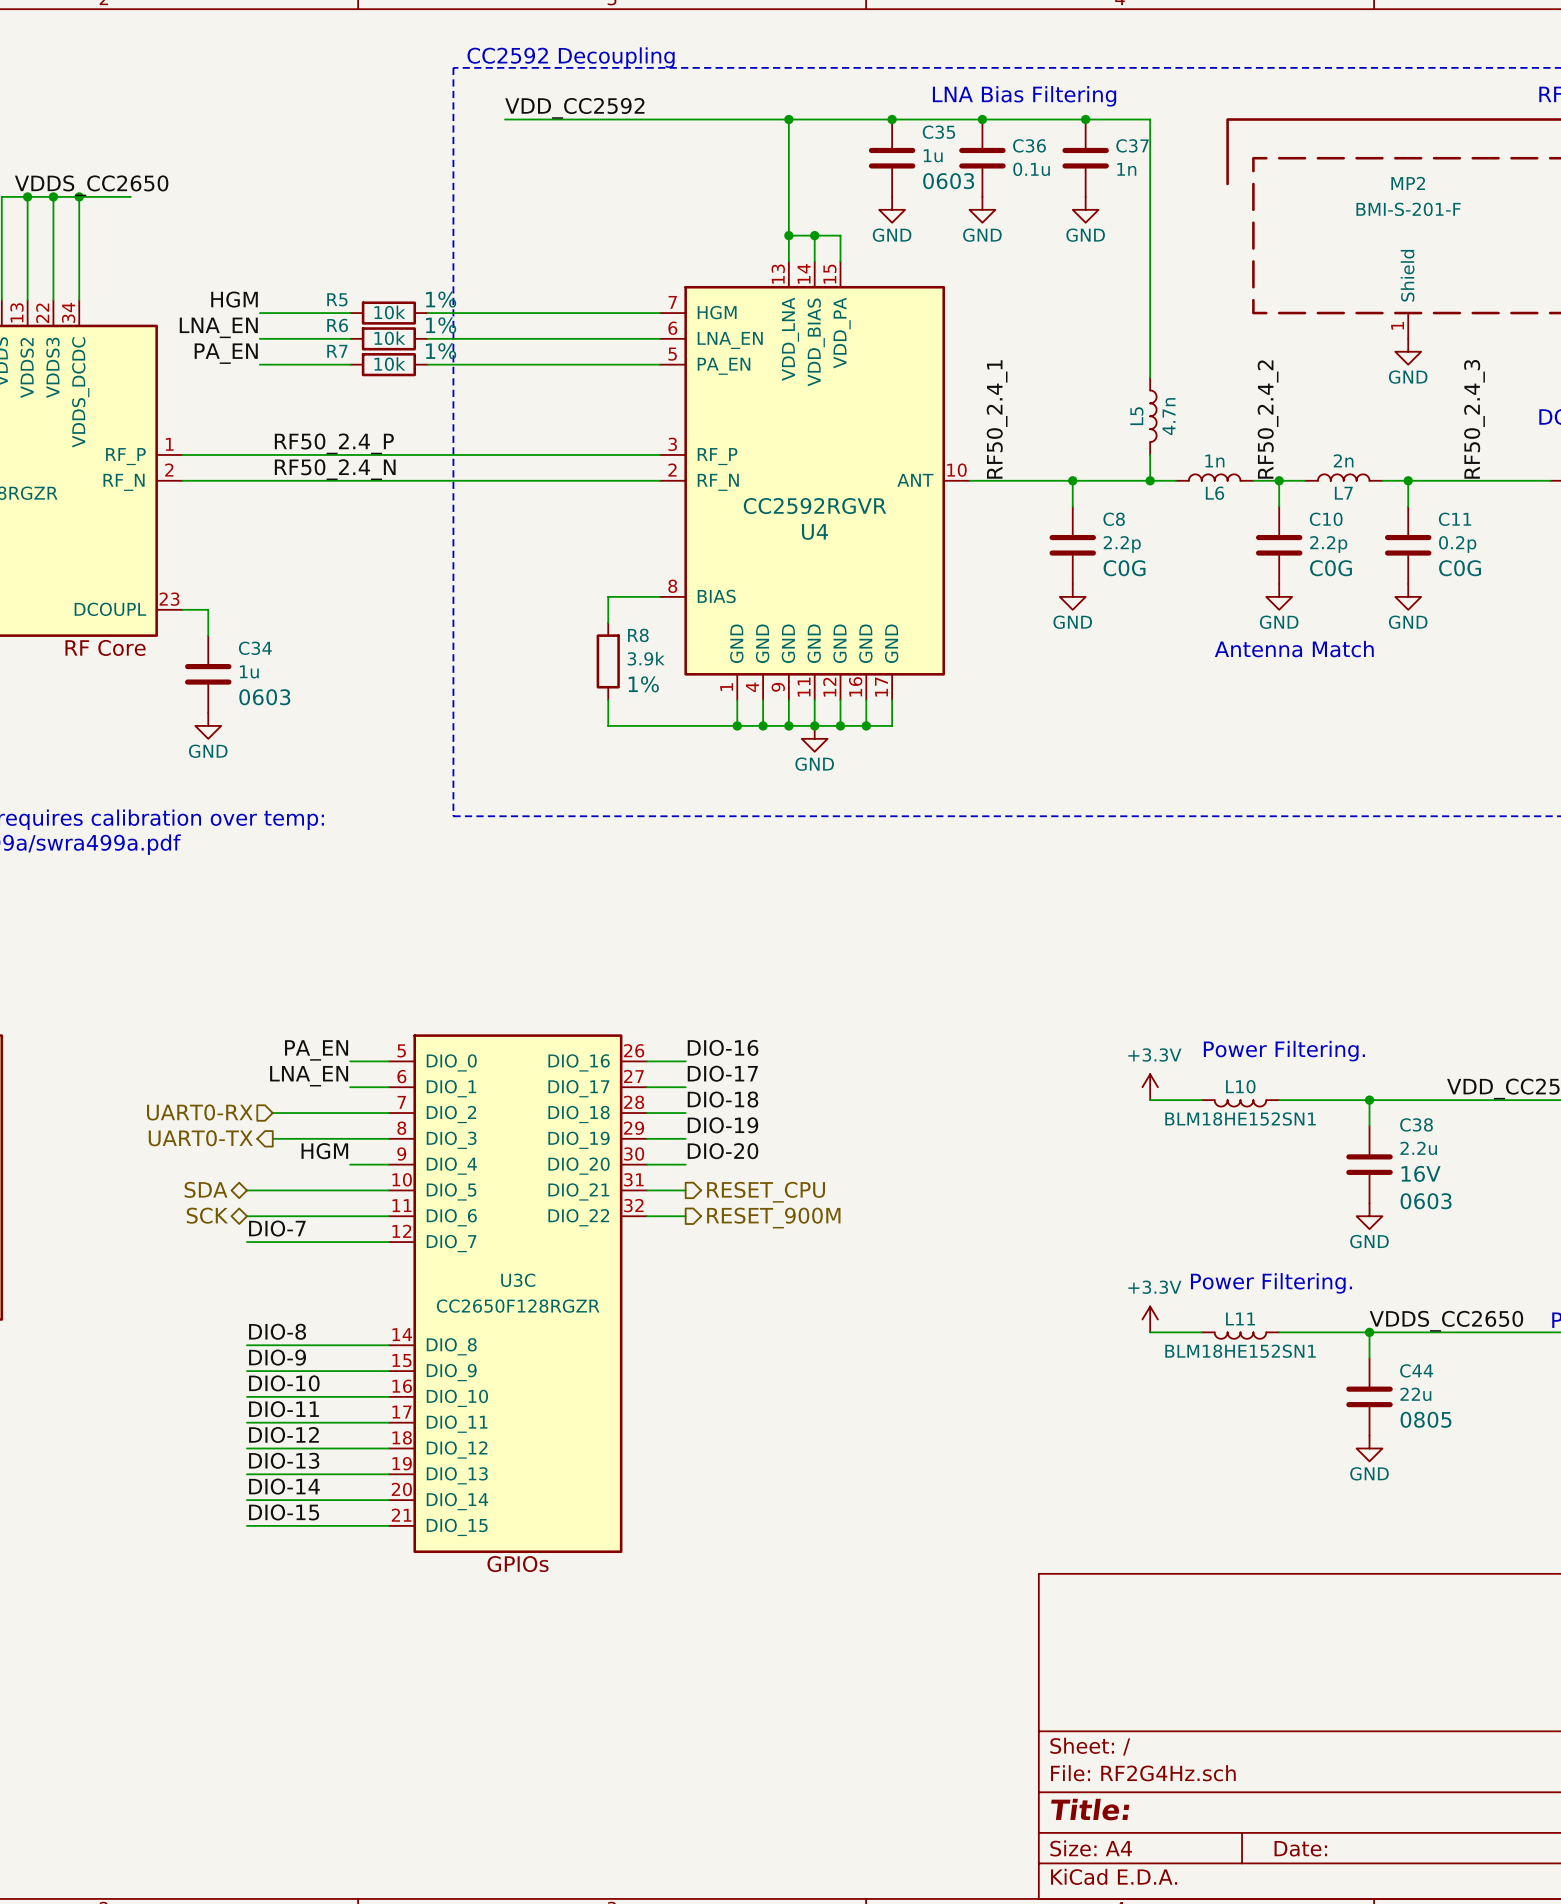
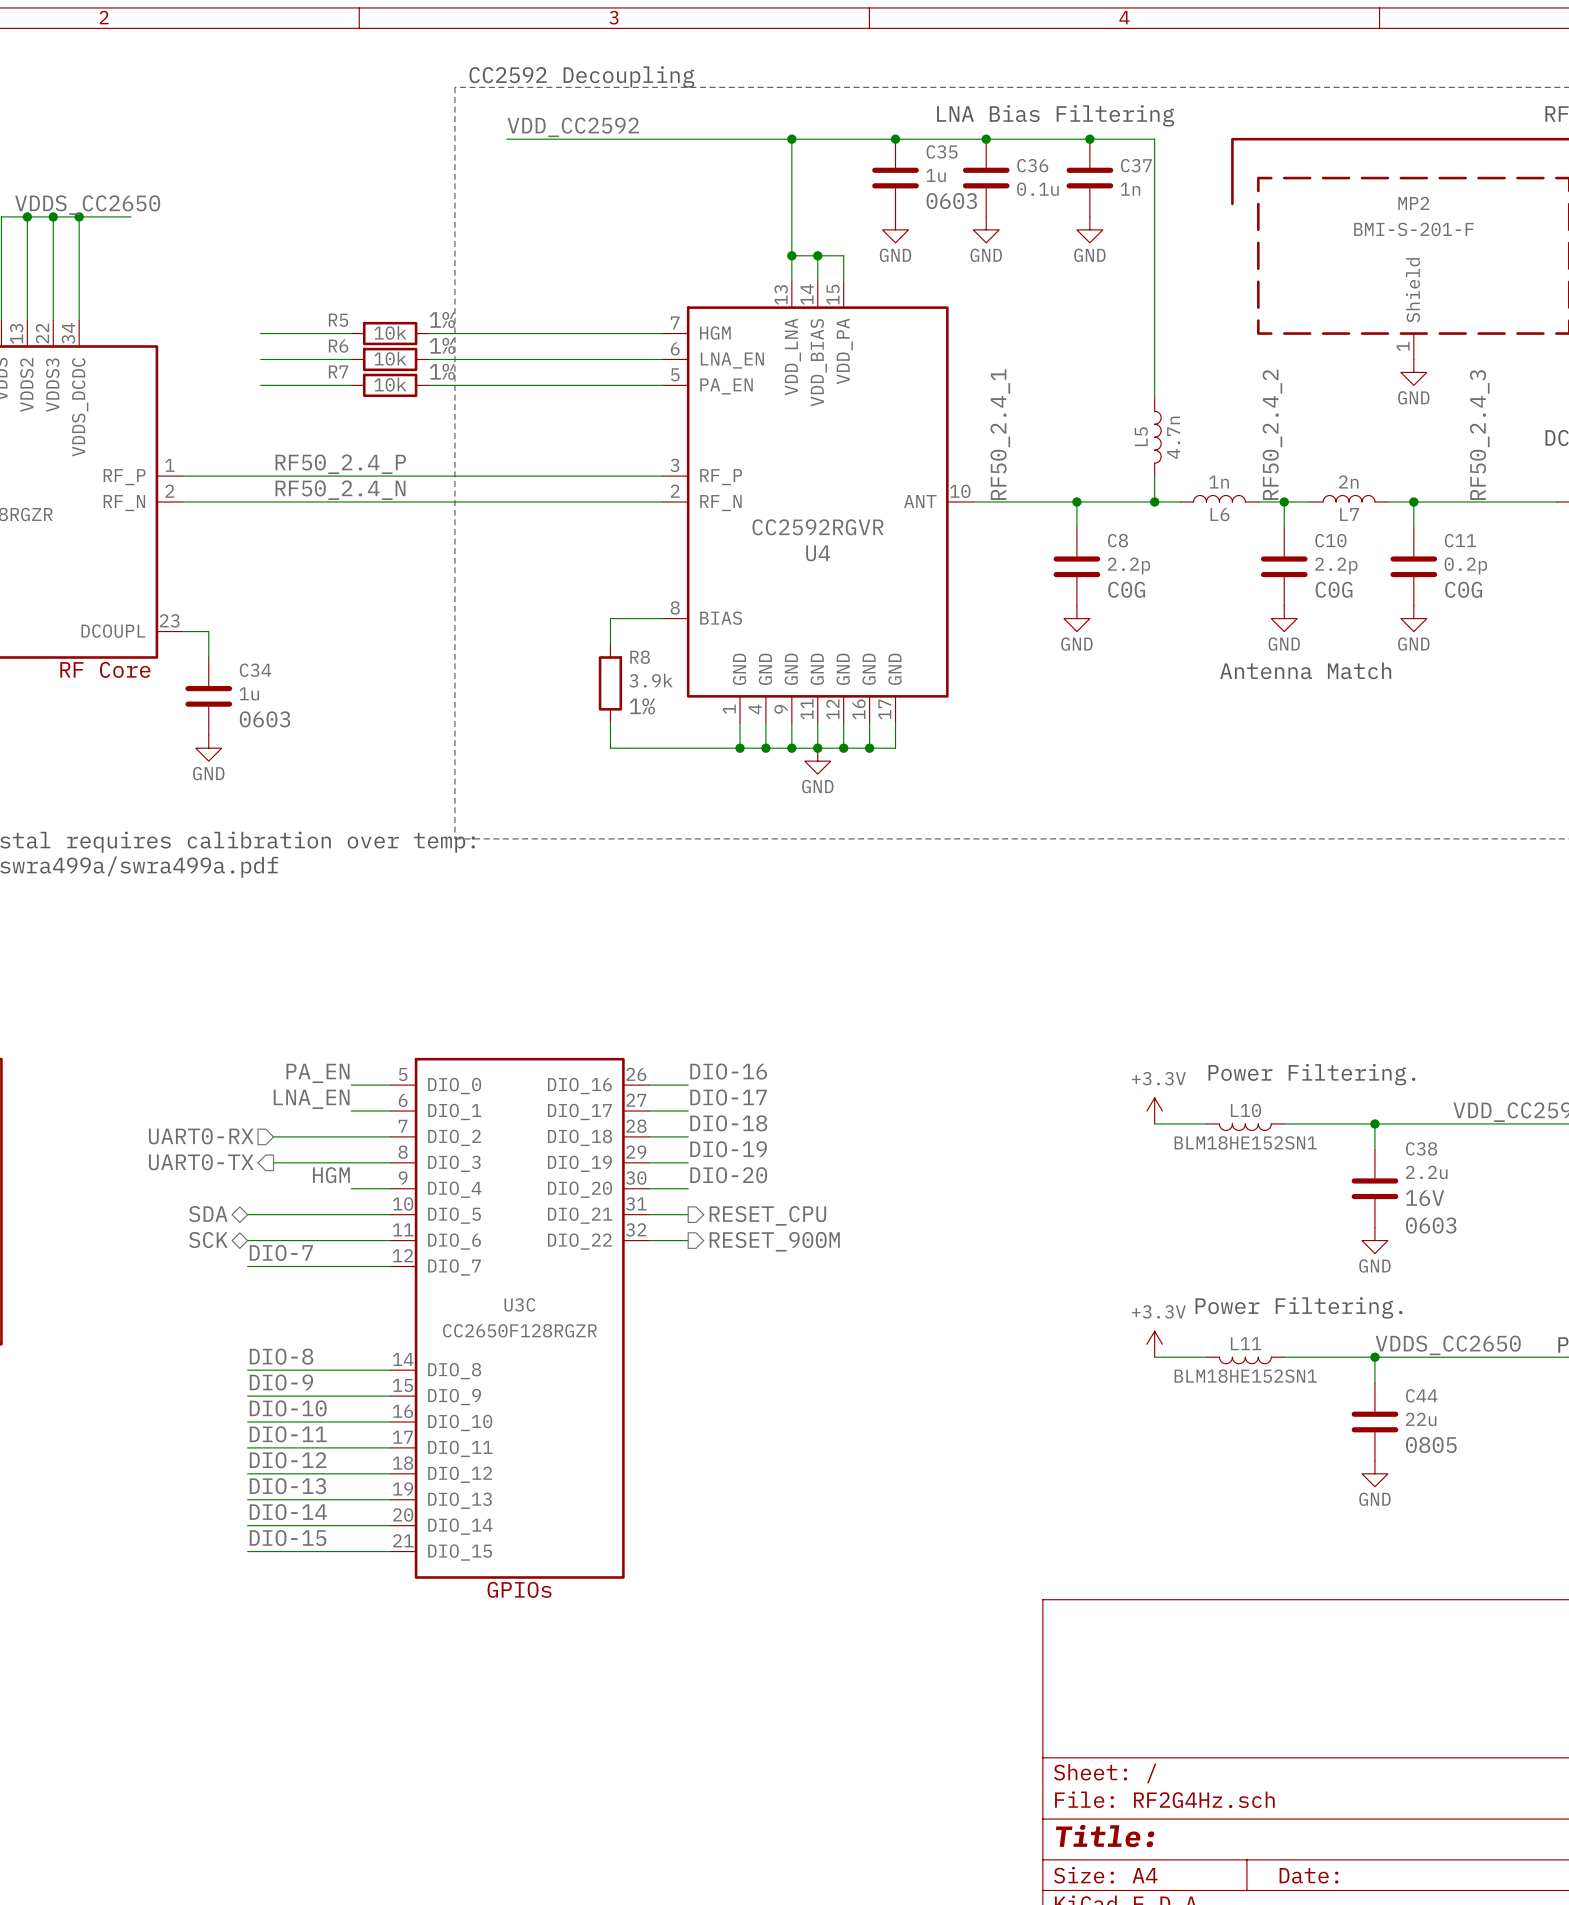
label: HGM (234, 299) -> none
label: LNA_EN (218, 327) -> none
label: PA_EN (226, 353) -> none

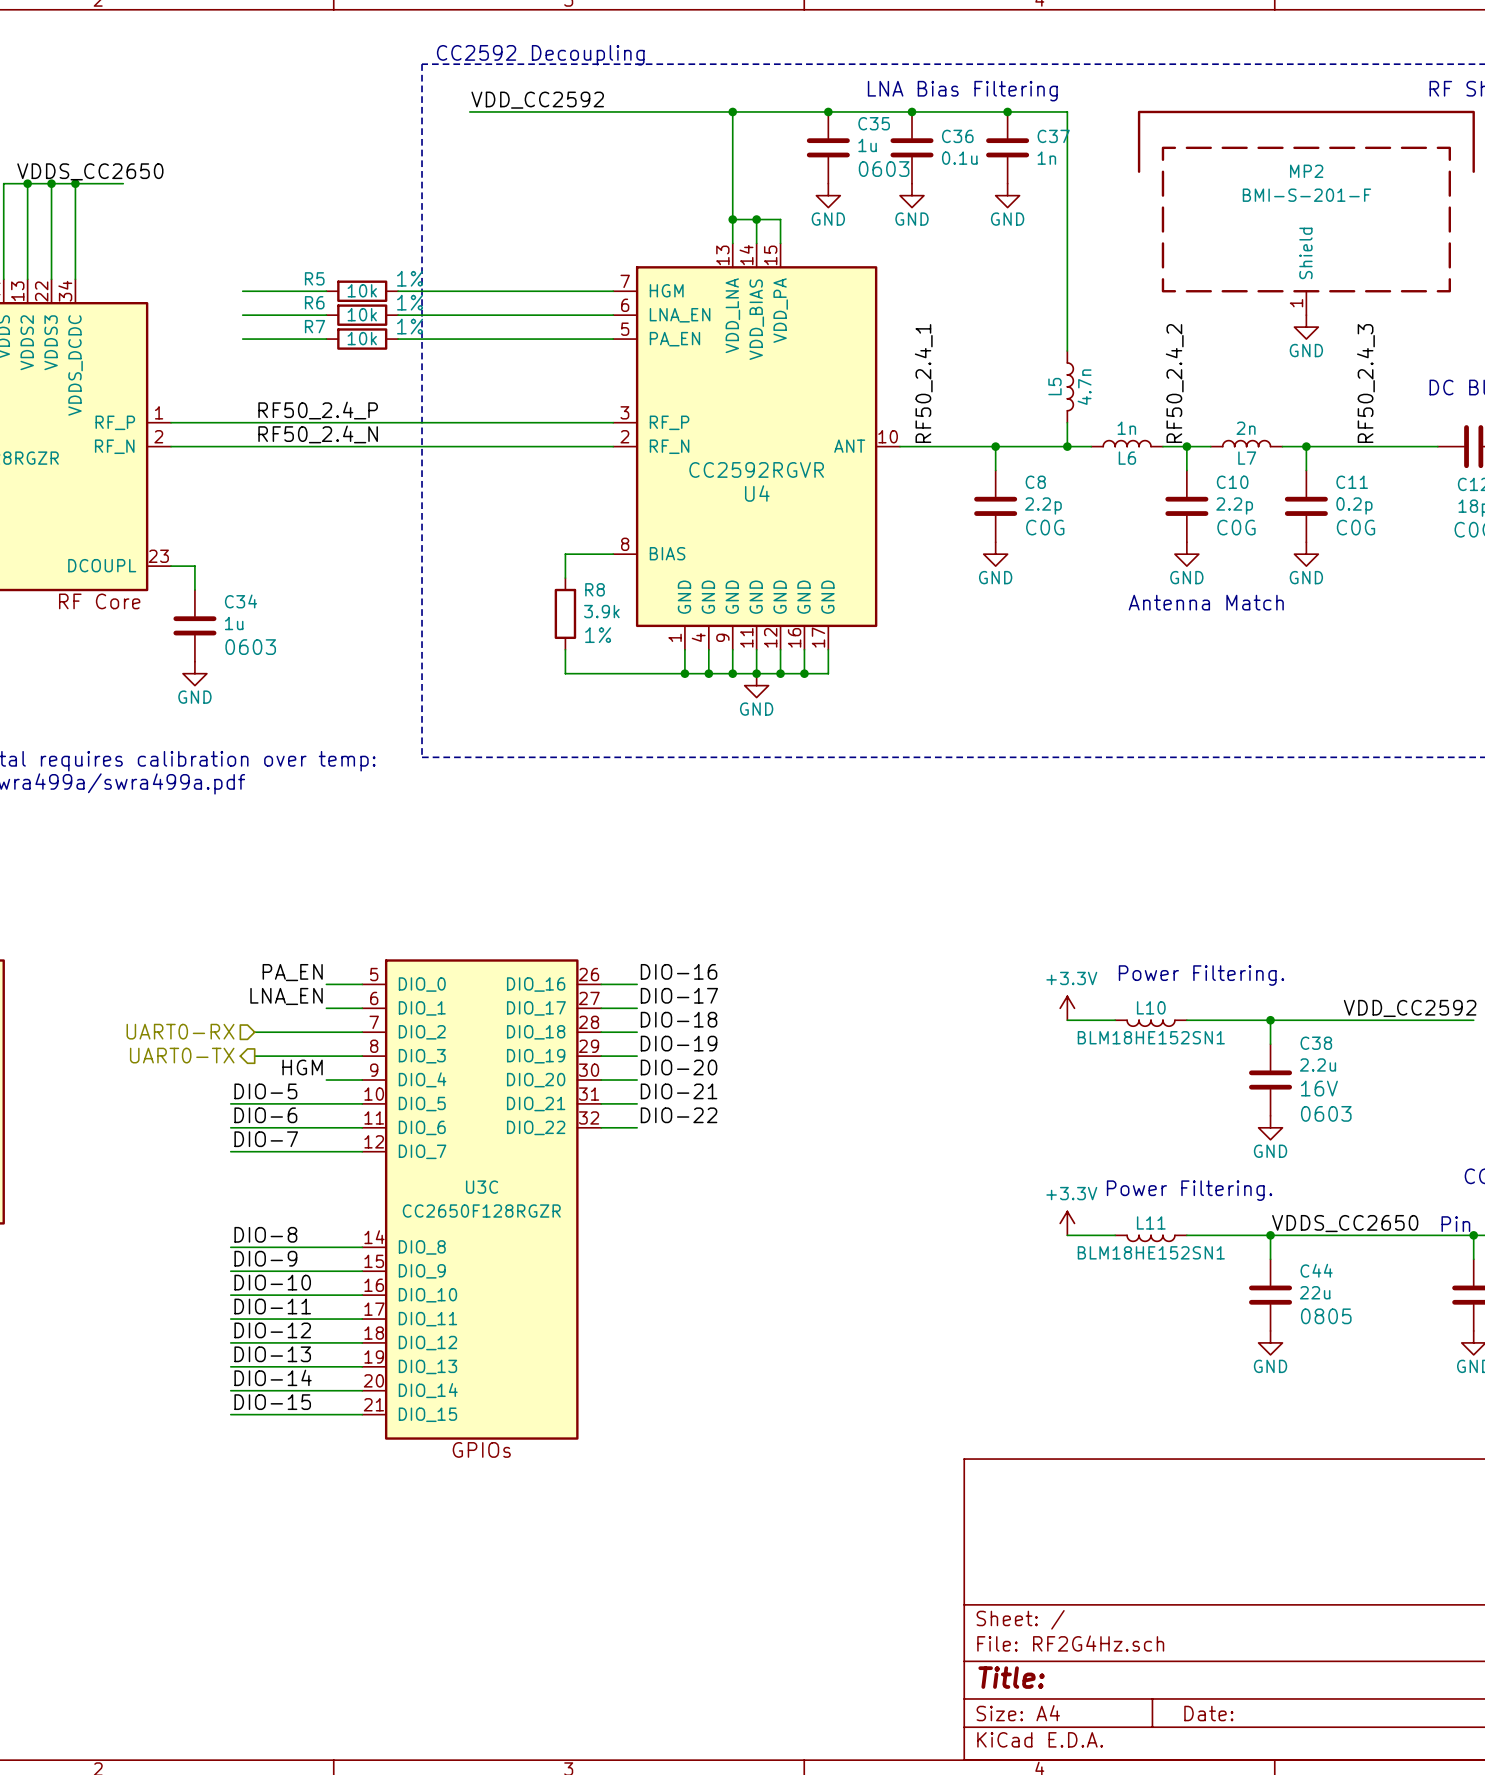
label: none -> DIO-5 (265, 1091)
label: none -> DIO-21 (679, 1091)
hierarchical label: SDA (208, 1214) -> none
hierarchical label: RESET_CPU (767, 1215) -> none
label: none -> DIO-6 (265, 1115)
label: none -> DIO-22 (679, 1115)
hierarchical label: SCK (208, 1240) -> none
hierarchical label: RESET_900M (774, 1241) -> none

